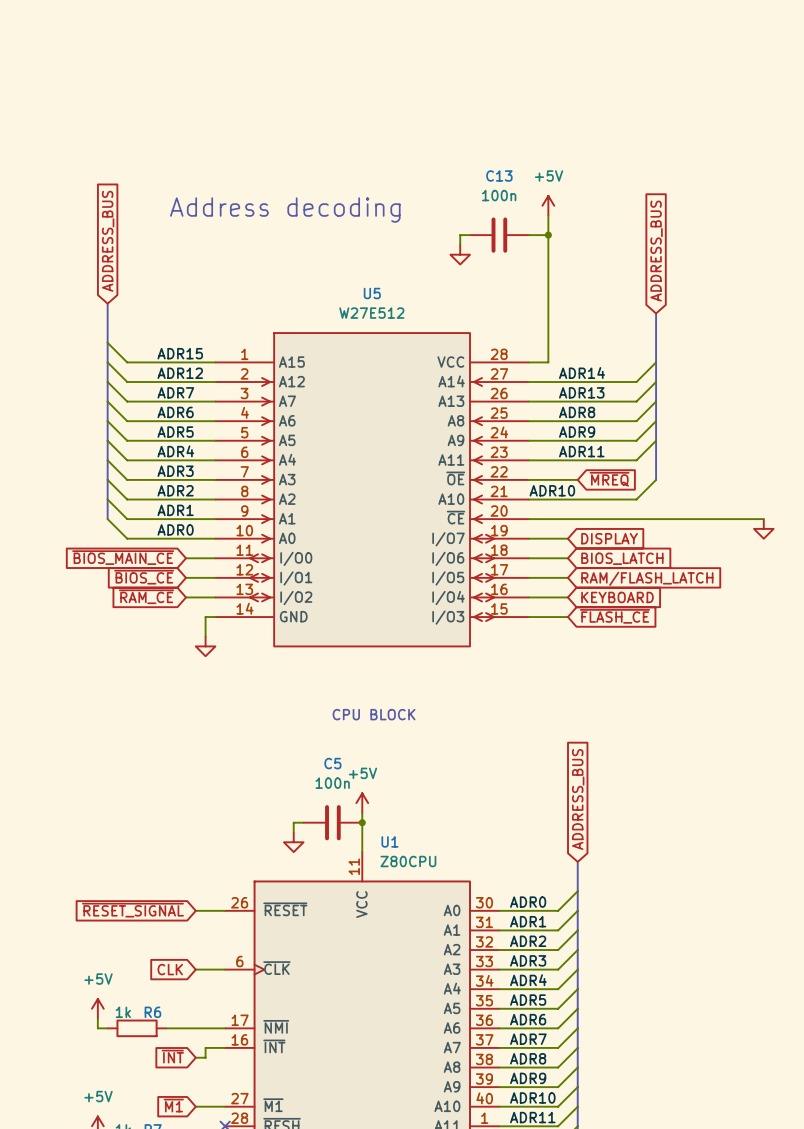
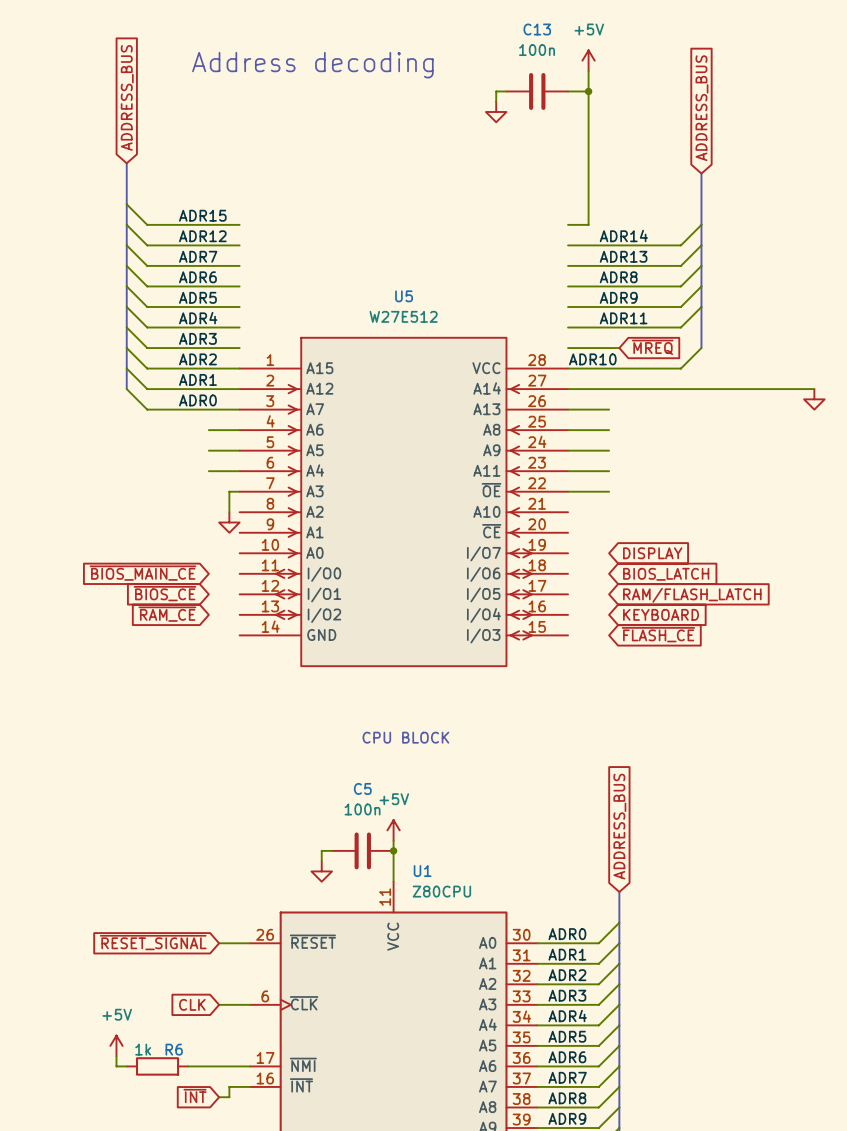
wire: none -> (588, 70) (588, 214)
junction: none -> (588, 91)
bus: none -> (126, 163) (126, 306)
wire: none -> (126, 204) (147, 224) (239, 224)
power symbol position: +5V (548, 205) -> +5V (588, 60)
text position: Address decoding (285, 210) -> Address decoding (312, 65)
label: none -> ADR15 (202, 215)
wire: none -> (126, 224) (147, 245) (239, 245)
wire: (548, 225) (548, 362) -> (588, 224) (568, 224)
wire: none -> (701, 224) (680, 245) (568, 245)
wire: (470, 235) (460, 235) (460, 244) -> (506, 91) (496, 91) (496, 101)
C13 position: (499, 235) -> (537, 91)
wire: (528, 235) (548, 235) -> (568, 91) (588, 91)
junction: (548, 235) -> none
label: none -> ADR12 (202, 236)
global label position: ADDRESS_BUS (108, 241) -> ADDRESS_BUS (127, 97)
wire: none -> (126, 245) (147, 265) (239, 265)
wire: none -> (701, 245) (680, 265) (568, 265)
global label position: ADDRESS_BUS (656, 251) -> ADDRESS_BUS (701, 108)
power symbol position: (460, 254) -> (496, 111)
label: none -> ADR7 (198, 256)
wire: none -> (126, 265) (147, 286) (239, 286)
wire: none -> (701, 265) (680, 286) (568, 286)
wire: none -> (126, 286) (147, 306) (239, 306)
wire: none -> (701, 286) (680, 306) (568, 306)
wire: none -> (568, 348) (619, 348)
wire: none -> (701, 348) (680, 368) (588, 368)
bus: (656, 342) (656, 479) -> (701, 173) (701, 317)
label: ADR15 (180, 353) -> ADR2 (197, 359)
wire: (656, 362) (636, 382) -> (814, 389) (680, 389)
label: ADR12 (180, 373) -> ADR1 (197, 379)
label position: ADR14 (582, 373) -> ADR14 (623, 236)
bus: (107, 382) (107, 519) -> none
wire: (656, 382) (636, 401) (567, 401) -> none
label: ADR7 (175, 392) -> ADR0 (197, 400)
label position: ADR13 (581, 392) -> ADR13 (623, 256)
wire: (107, 401) (127, 421) (186, 421) -> none
wire: (656, 401) (636, 421) (567, 421) -> none
label position: ADR6 (175, 412) -> ADR6 (197, 277)
label position: ADR8 (577, 412) -> ADR8 (618, 277)
wire: (107, 421) (127, 440) (186, 440) -> none
wire: (656, 421) (636, 440) (567, 440) -> none
label position: ADR5 (175, 432) -> ADR5 (197, 297)
label position: ADR9 (577, 432) -> ADR9 (618, 297)
wire: (107, 440) (127, 460) (186, 460) -> none
wire: (656, 440) (636, 460) (567, 460) -> none
label position: ADR4 (175, 451) -> ADR4 (198, 318)
label position: ADR11 (581, 451) -> ADR11 (623, 318)
wire: (107, 460) (127, 479) (205, 479) -> (229, 512) (229, 491)
label position: ADR3 (175, 471) -> ADR3 (197, 338)
wire: (107, 479) (127, 499) (215, 499) -> (126, 306) (147, 327) (239, 327)
wire: (567, 479) (577, 479) -> none
global label position: ~{MREQ} (609, 479) -> ~{MREQ} (652, 347)
wire: (656, 479) (636, 499) (528, 499) -> (701, 306) (680, 327) (568, 327)
label: ADR2 (175, 490) -> none
label position: ADR10 (552, 490) -> ADR10 (592, 359)
wire: (107, 499) (127, 519) (215, 519) -> (126, 327) (147, 348) (239, 348)
label: ADR1 (175, 510) -> none
wire: (107, 519) (127, 538) (215, 538) -> none
wire: (528, 519) (763, 519) -> none
power symbol position: (763, 528) -> (814, 399)
label: ADR0 (175, 529) -> none
wire: (528, 538) (567, 538) -> none
wire: (186, 558) (215, 558) -> none
wire: (528, 558) (567, 558) -> none
wire: (186, 577) (215, 577) -> none
wire: (528, 577) (567, 577) -> none
wire: (186, 597) (215, 597) -> none
wire: (528, 597) (567, 597) -> none
wire: (215, 617) (205, 617) (205, 636) -> none
wire: (528, 617) (567, 617) -> none
power symbol position: (205, 646) -> (229, 522)

